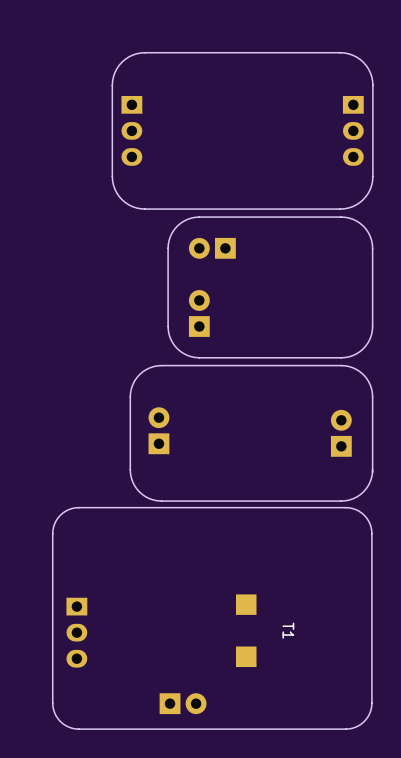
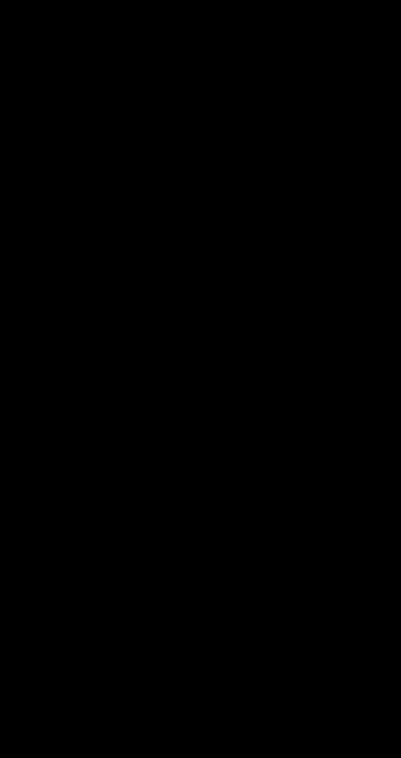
board edge: (340, 52) (144, 52) (128, 57) (119, 65) (112, 81) (112, 176) (116, 192) (128, 204) (144, 209) (340, 209) (356, 204) (366, 196) (372, 180) (372, 81) (368, 69) (360, 59) (348, 53) (340, 52) -> none
part: (131, 130) -> none
part: (353, 130) -> none
board edge: (341, 217) (199, 217) (191, 218) (180, 223) (170, 236) (168, 248) (168, 330) (174, 345) (183, 353) (199, 357) (341, 357) (353, 355) (360, 351) (368, 342) (372, 330) (372, 244) (370, 236) (363, 226) (353, 219) (341, 217) -> none
part: (212, 248) -> none
part: (199, 313) -> none
part: (158, 430) -> none
part: (341, 433) -> none
board edge: (372, 469) (372, 473) (370, 481) (363, 491) (353, 498) (345, 500) (161, 501) (149, 498) (136, 488) (130, 473) (130, 396) (132, 384) (142, 372) (157, 365) (341, 365) (353, 367) (366, 377) (372, 392) (372, 396) (372, 472) -> none
board edge: (345, 507) (78, 507) (62, 513) (56, 520) (52, 533) (52, 703) (58, 718) (68, 727) (78, 729) (345, 729) (361, 723) (369, 713) (371, 703) (371, 530) (364, 515) (355, 509) (345, 507) -> none
T1: (246, 630) -> none
part: (76, 632) -> none
part: (183, 703) -> none

